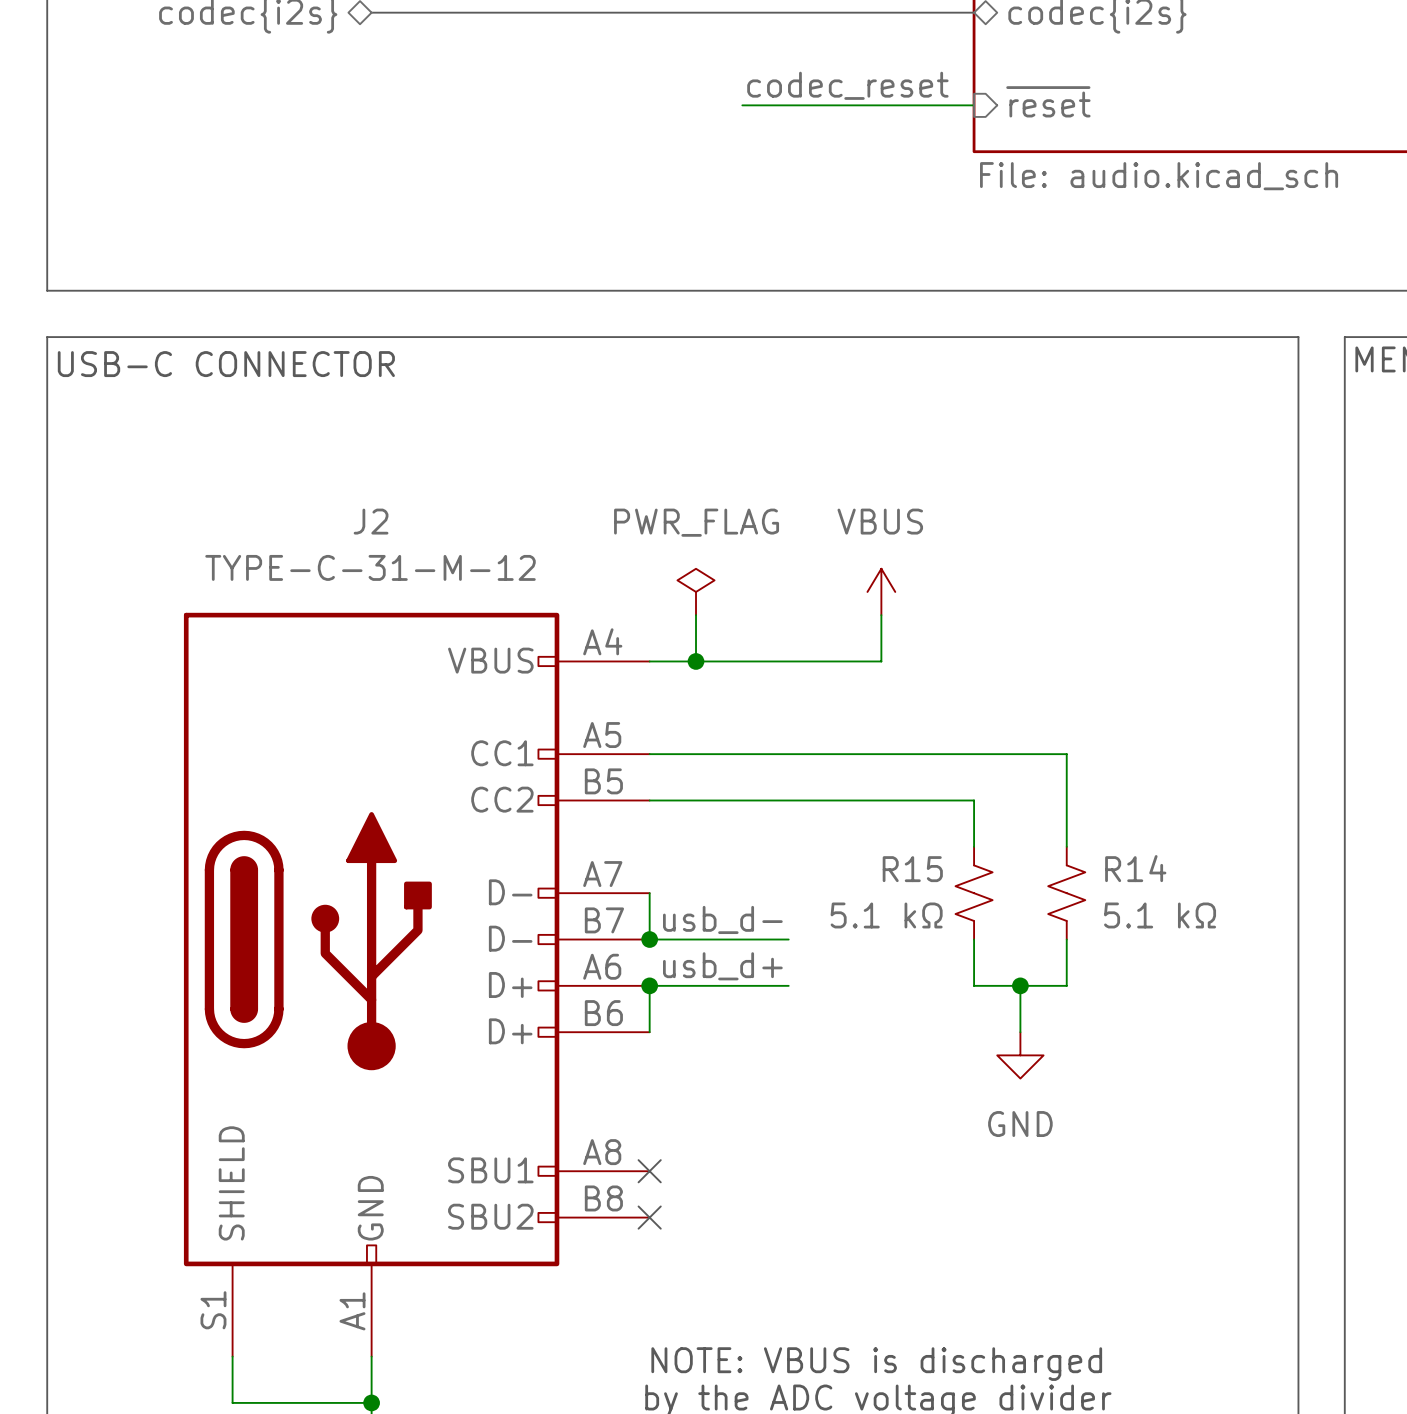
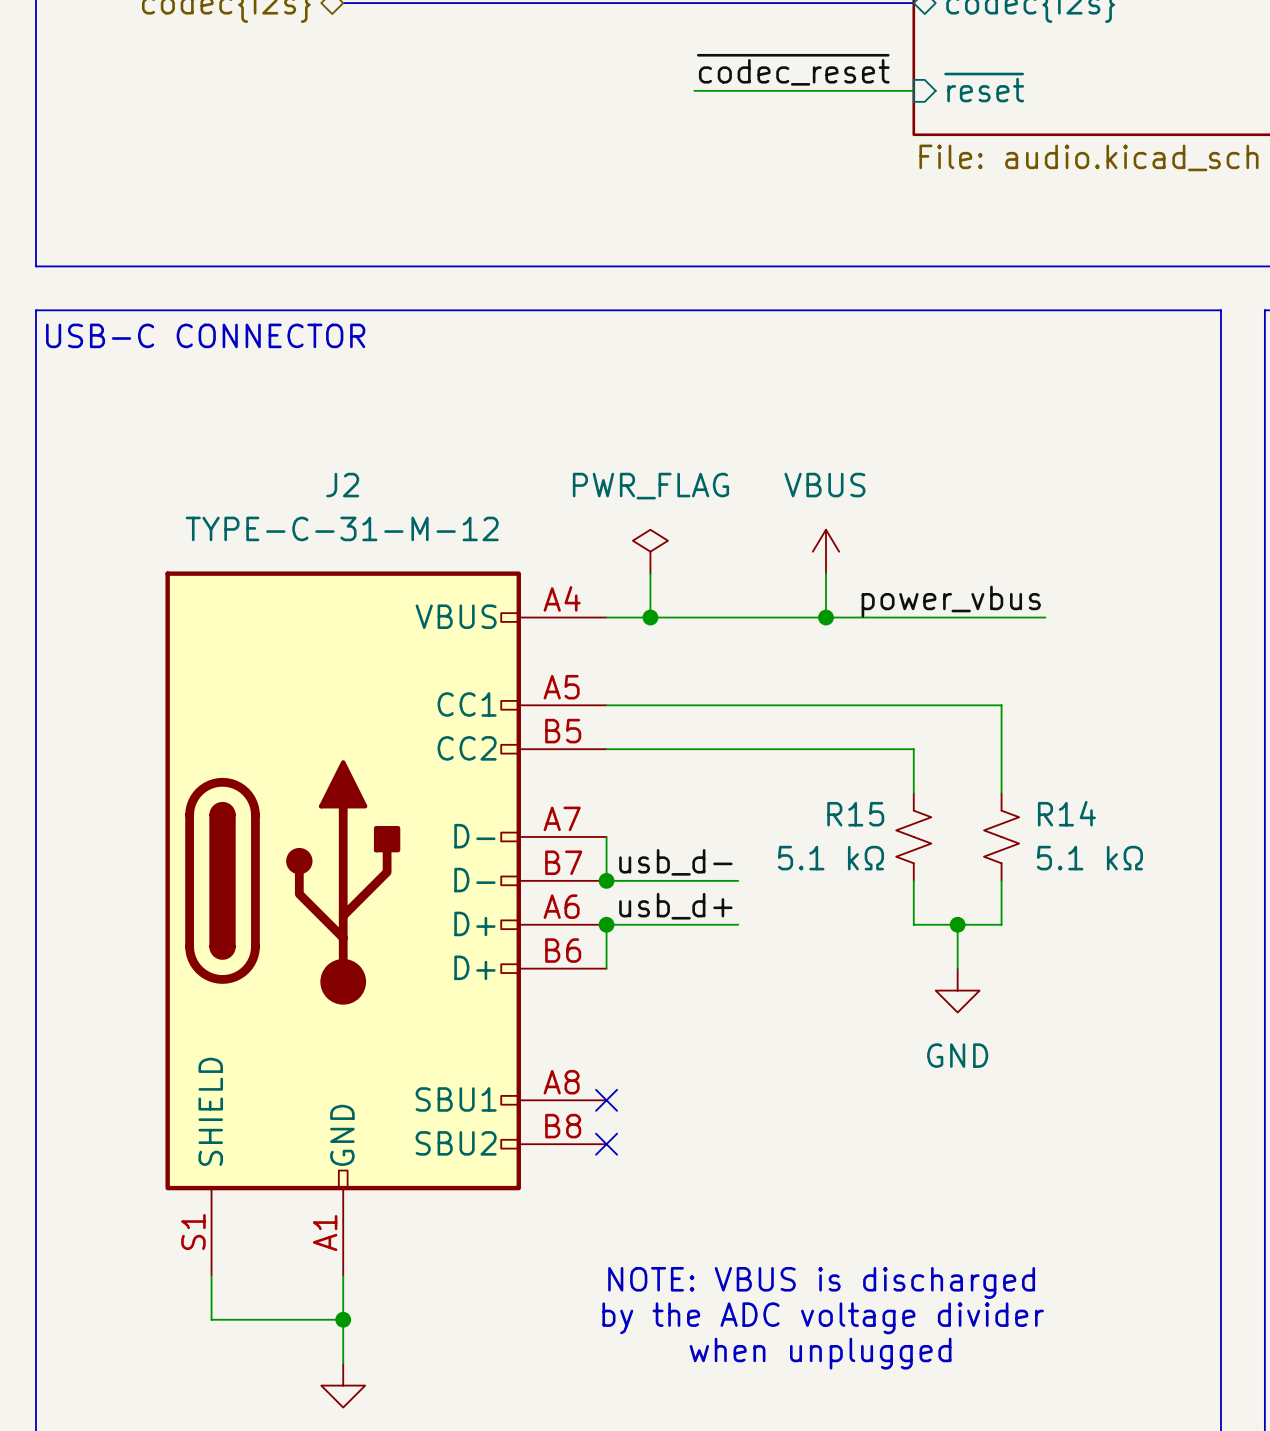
label: codec_reset (847, 85) -> ~{codec_reset} (793, 69)
label: none -> power_vbus (951, 601)
wire: none -> (826, 617) (1045, 617)
junction: none -> (826, 617)

